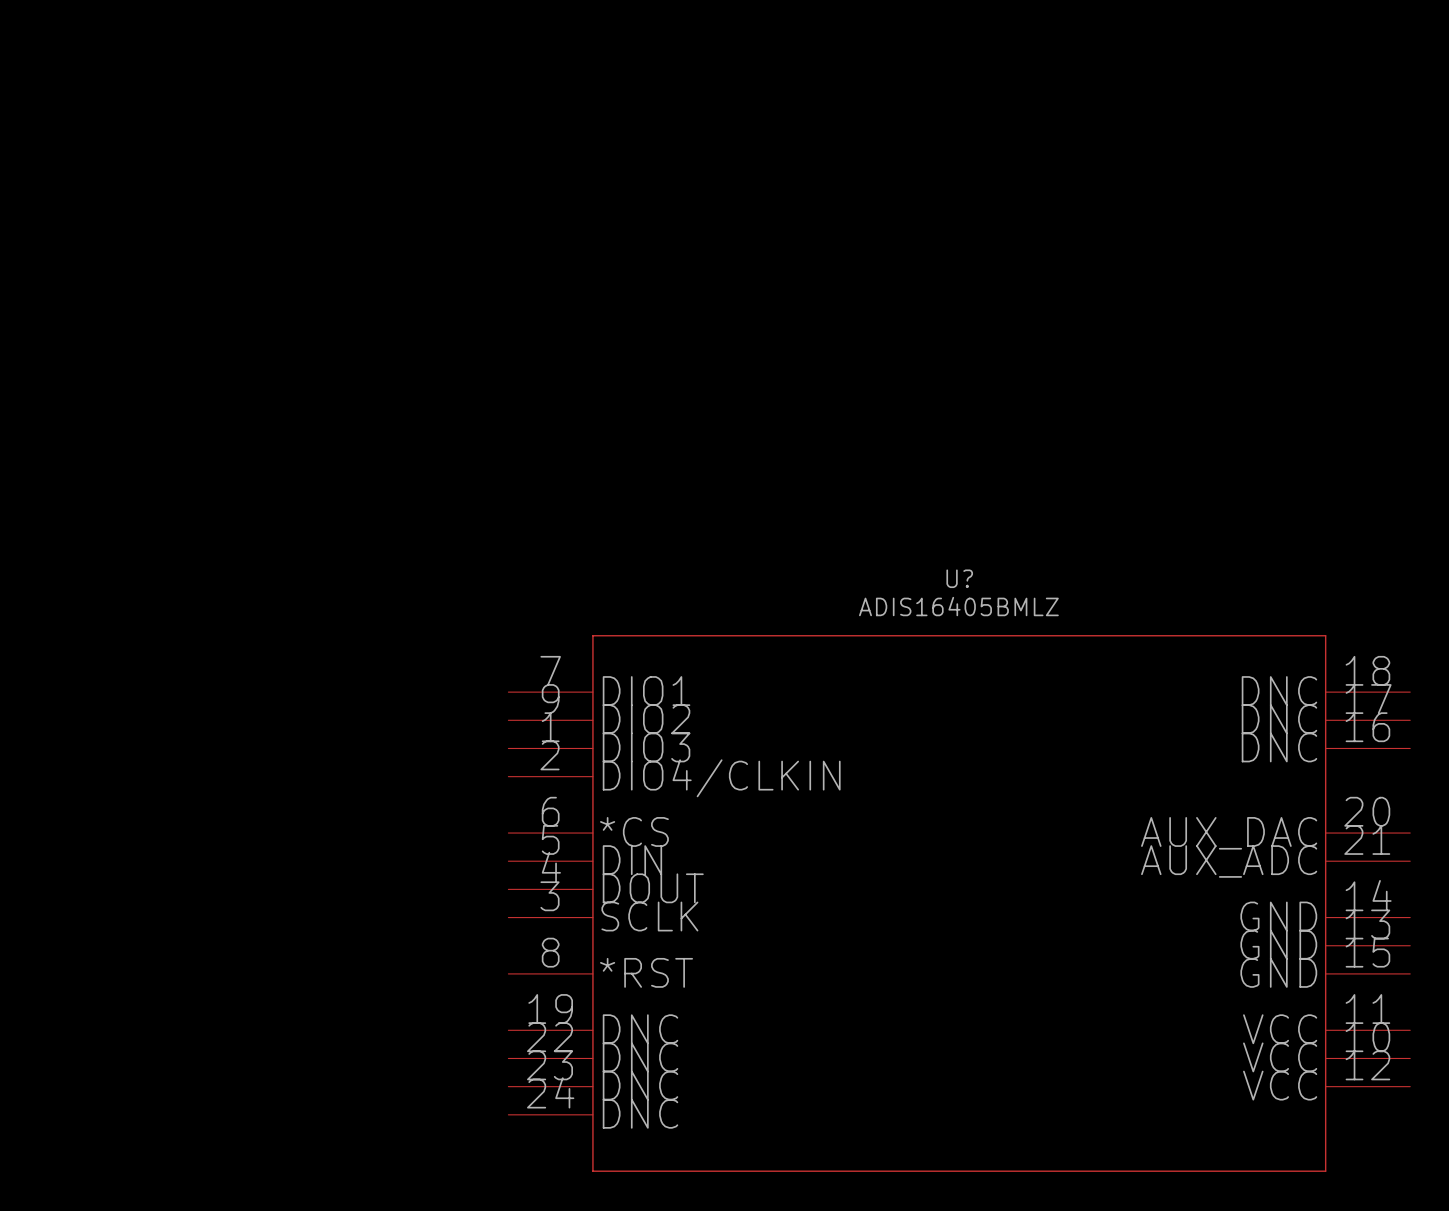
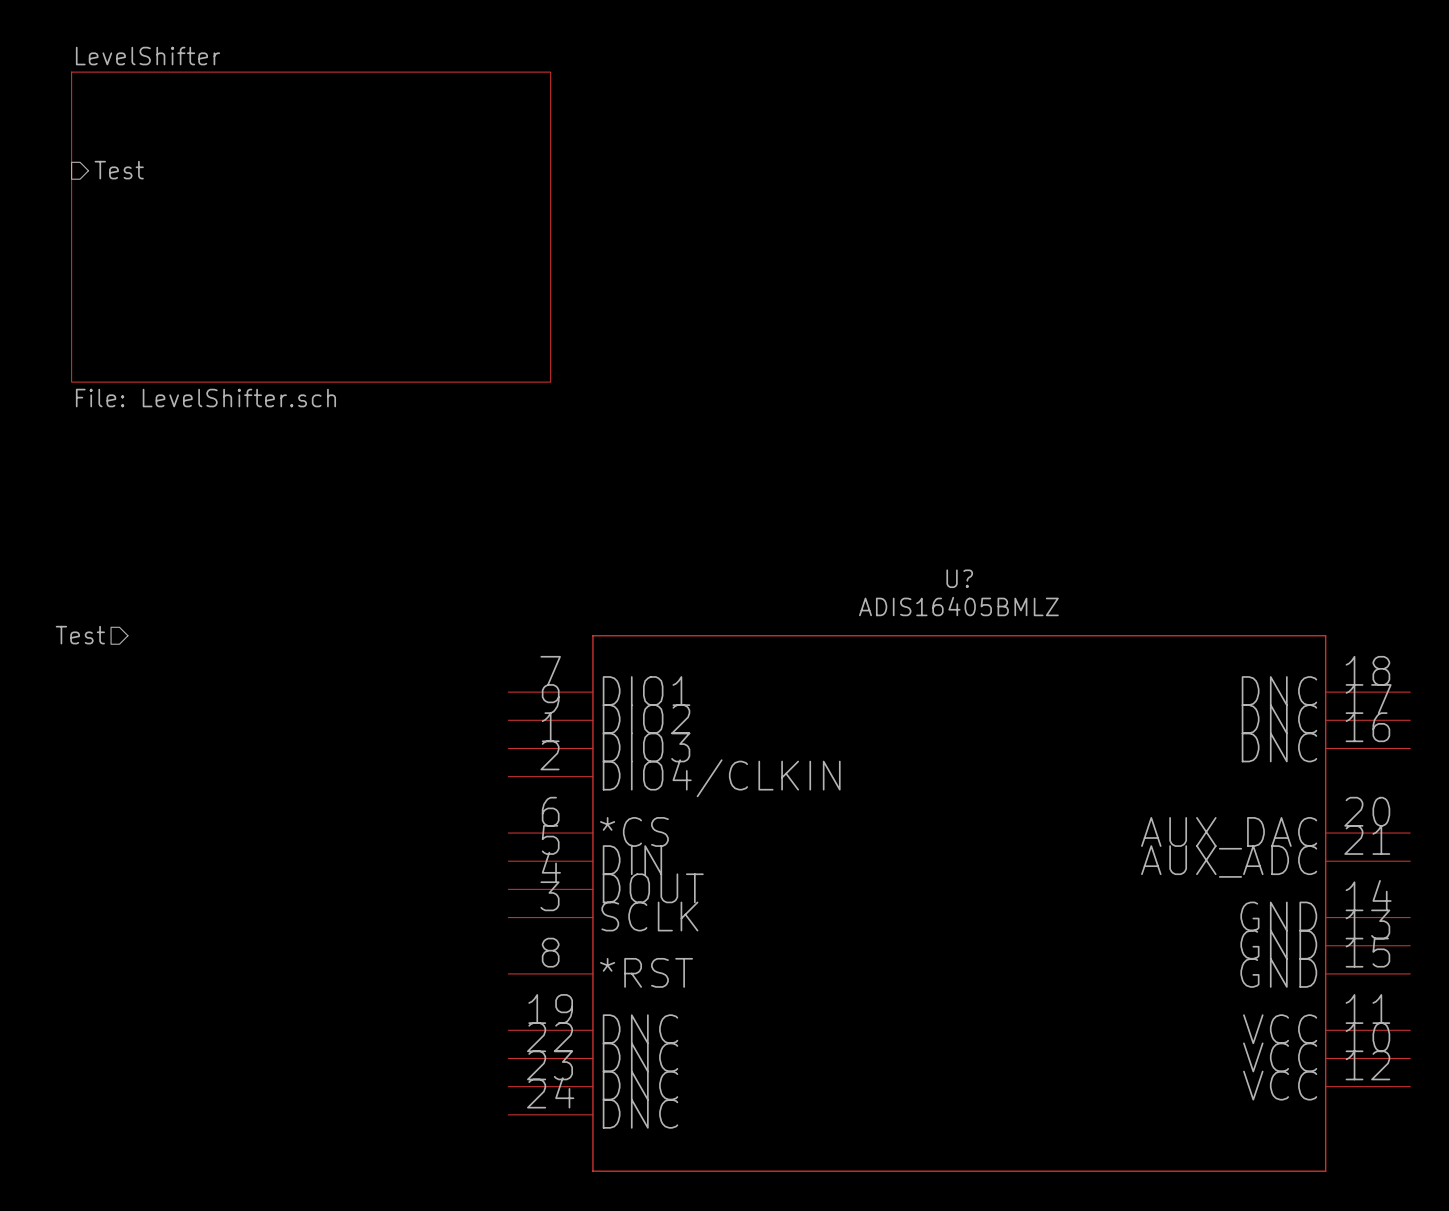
sheet pin: none -> Test (119, 170)
sheet LevelShifter: none -> File: LevelShifter.sch (311, 227)
hierarchical label: none -> Test (80, 635)

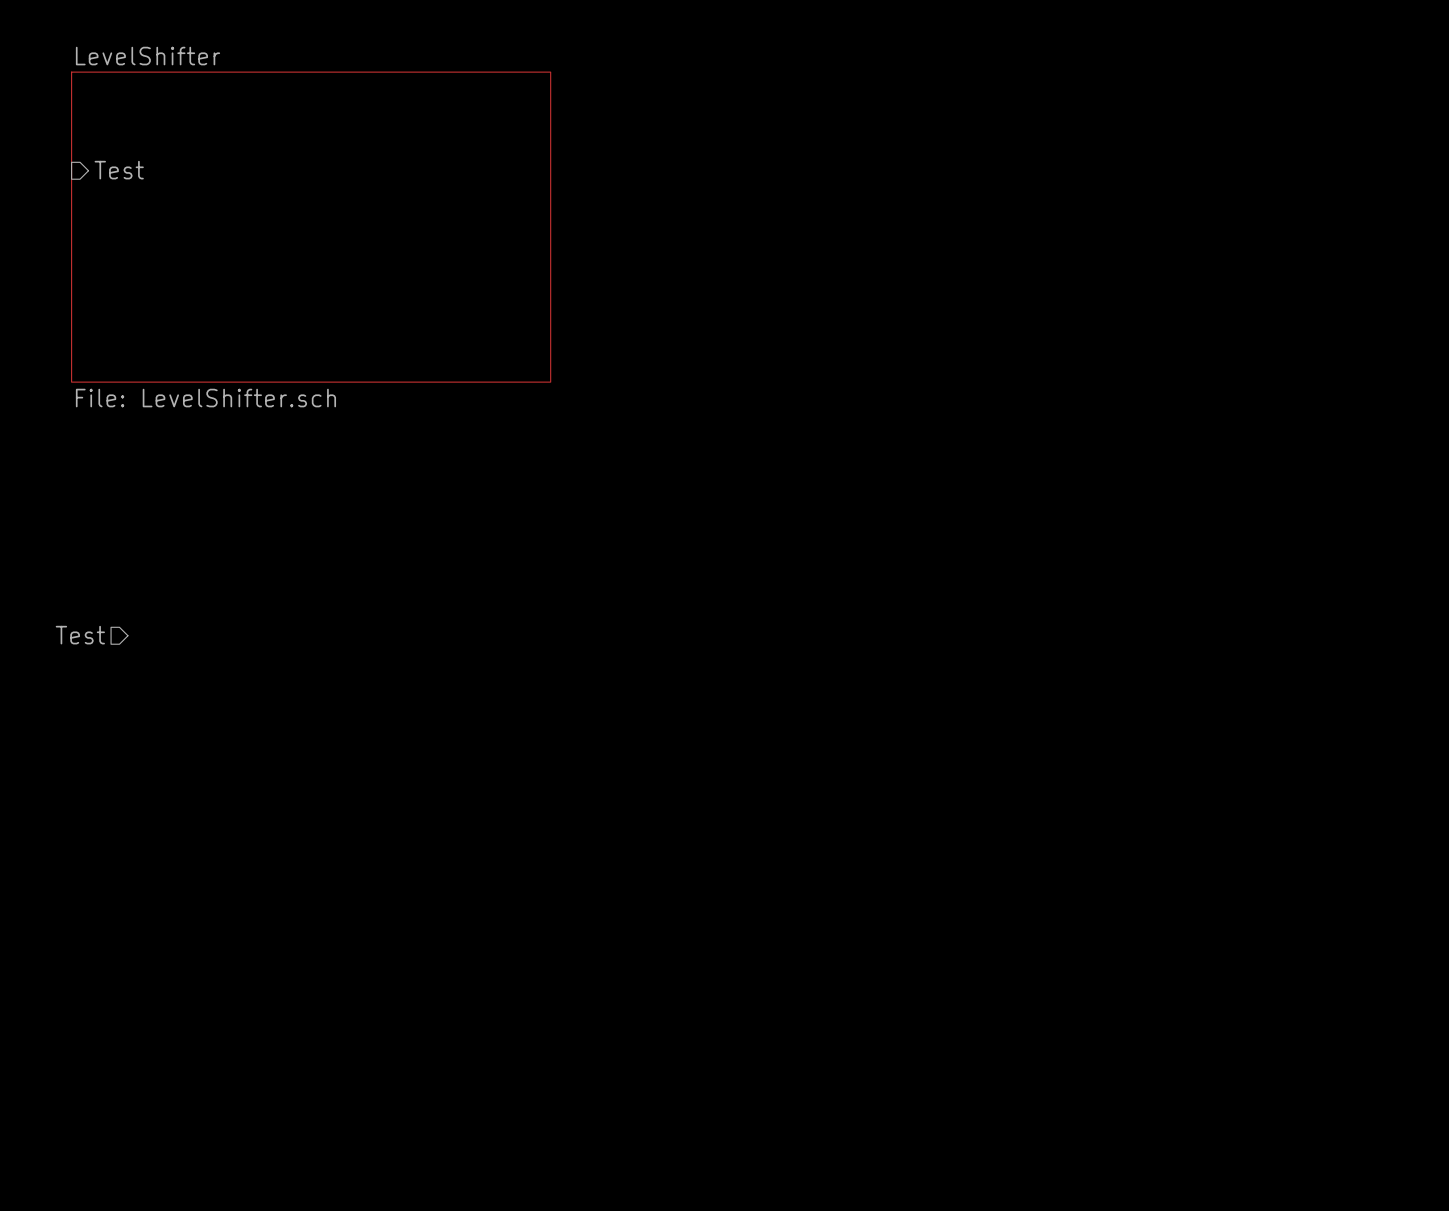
U?: ADIS16405BMLZ (959, 903) -> none

